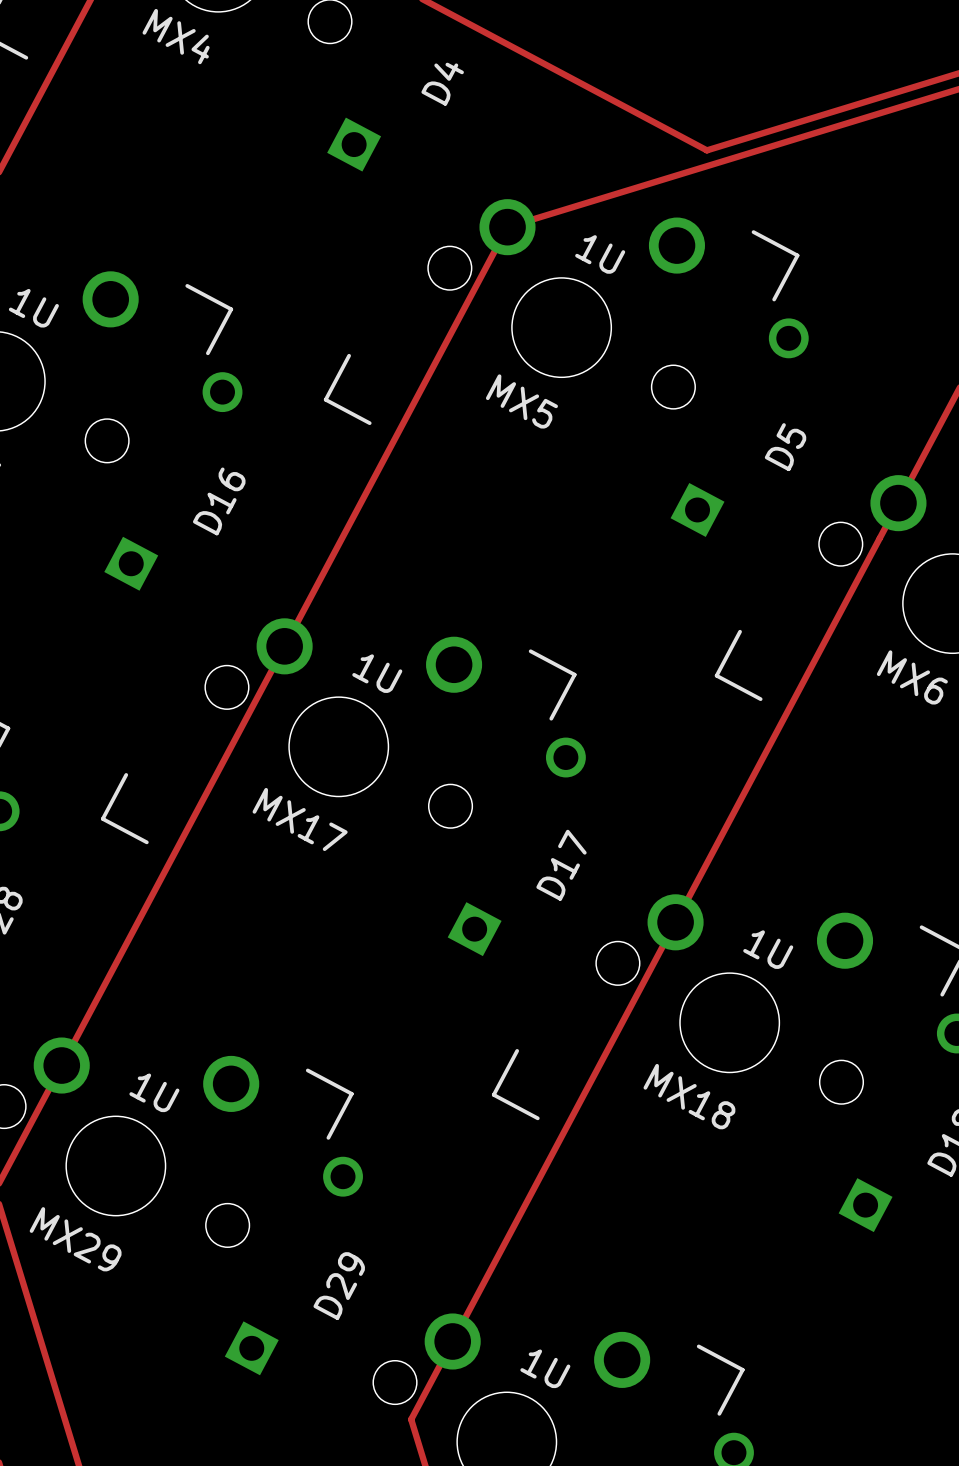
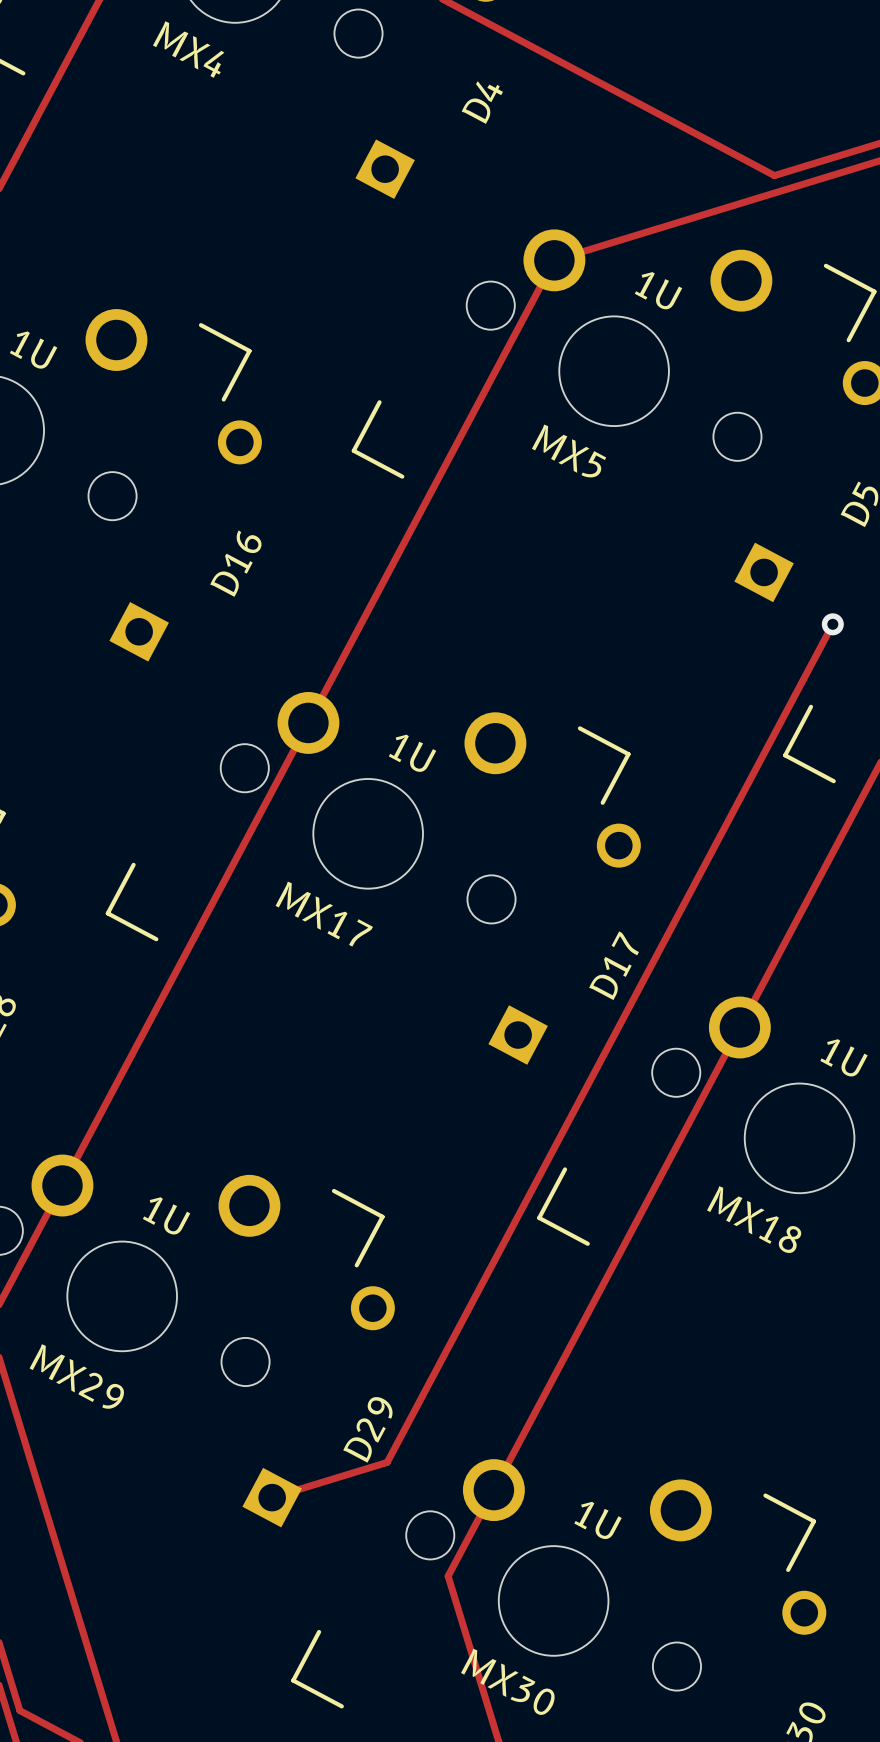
track: none -> (832, 624) (387, 1462) (272, 1497)
via: none -> (832, 624)

